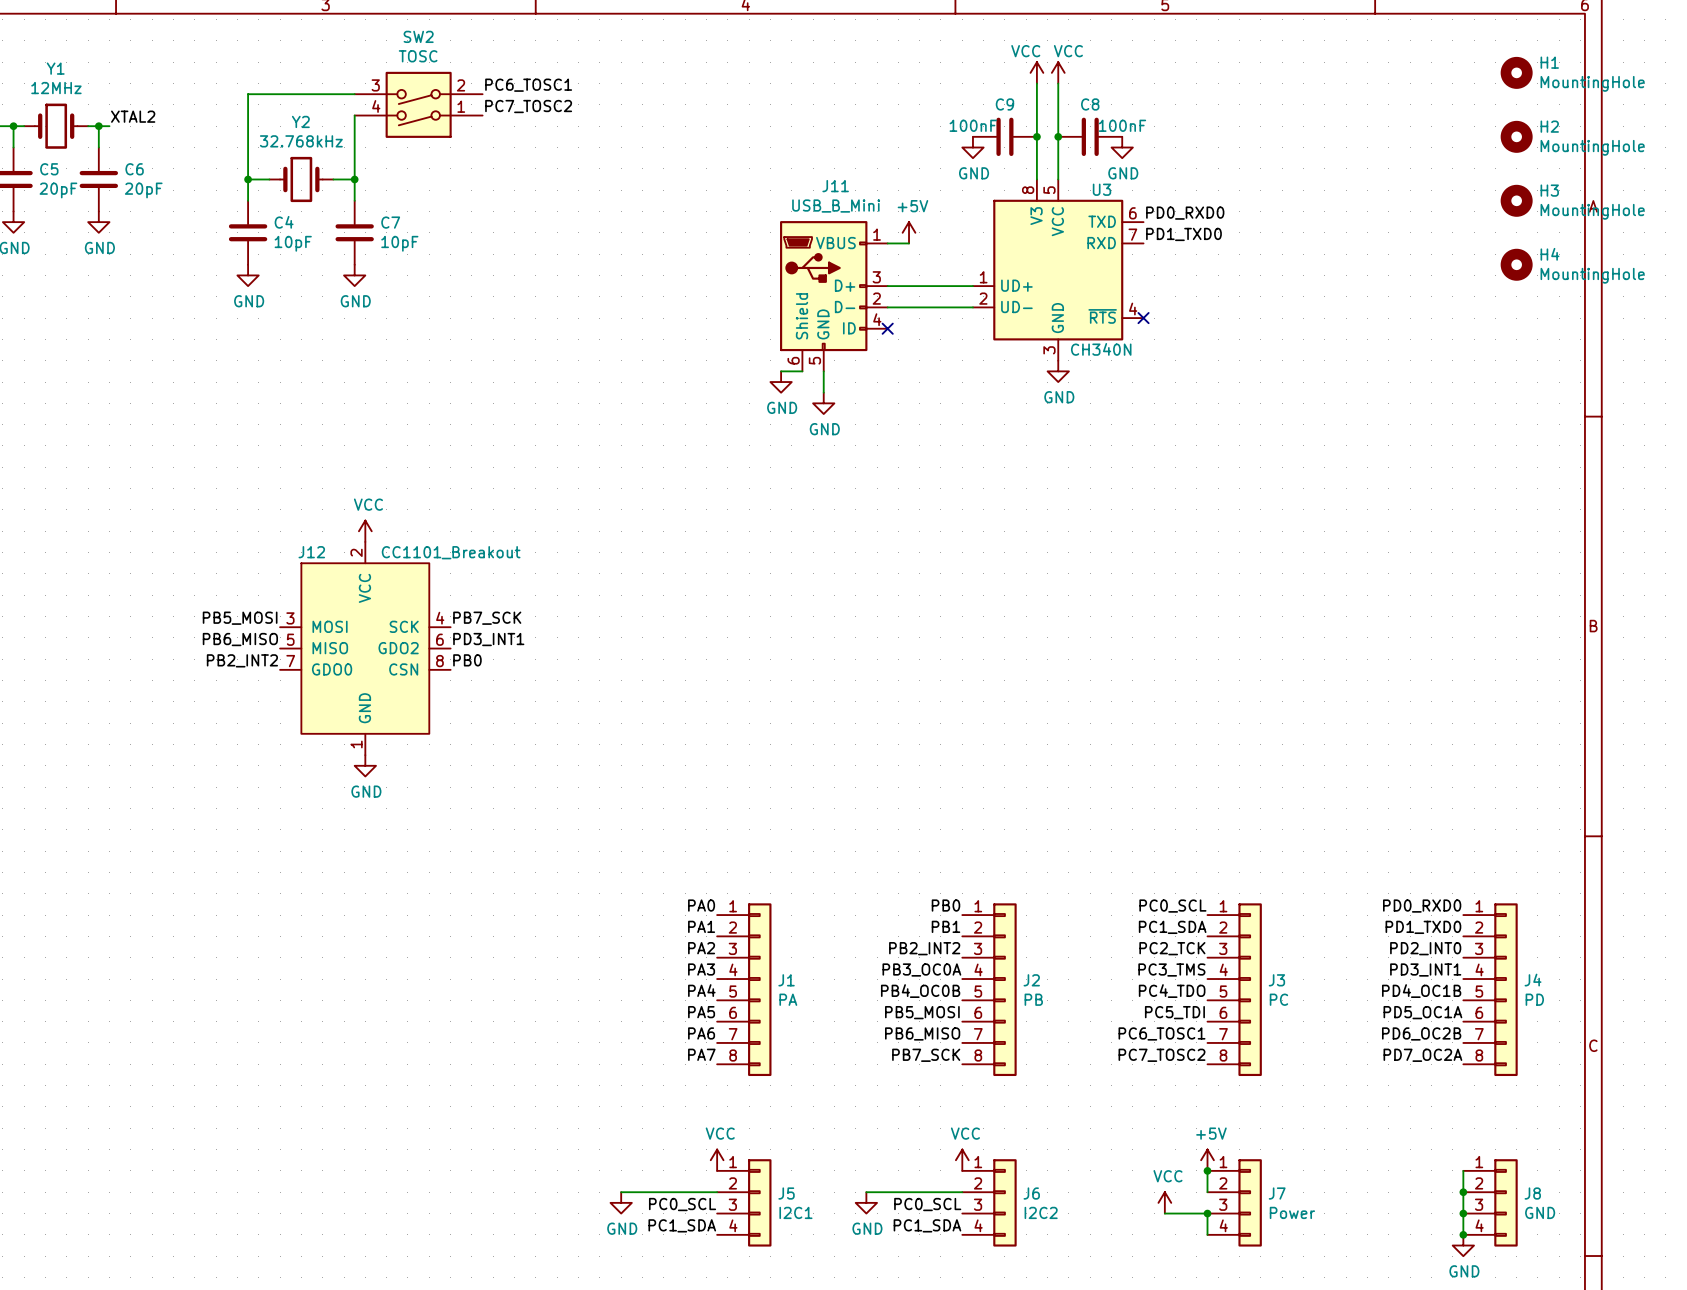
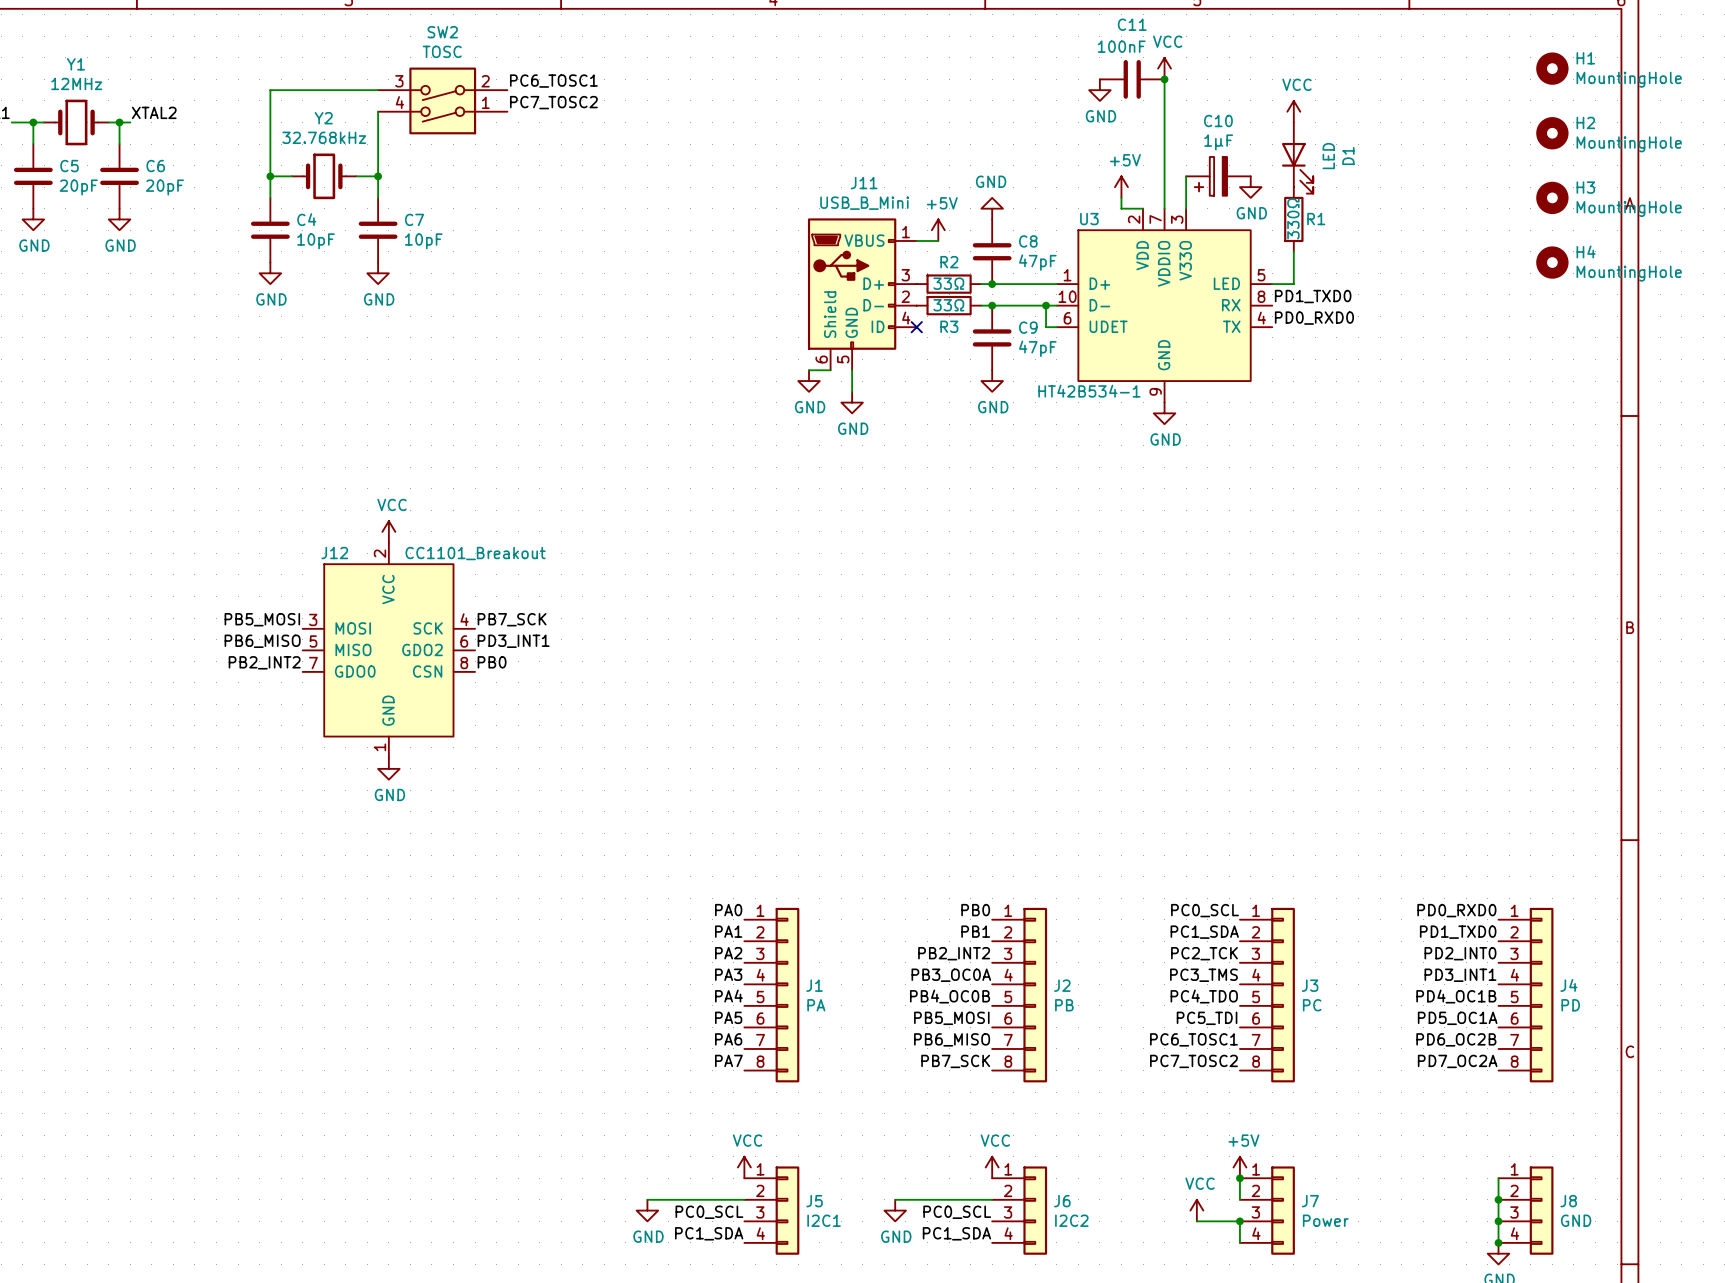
power symbol: VCC (1036, 72) -> none
power symbol: VCC (1058, 72) -> none
power symbol: none -> VCC (1164, 68)
wire: (1036, 83) (1036, 179) -> none
wire: (1058, 83) (1058, 179) -> none
C11: none -> 100nF (1132, 79)
wire: none -> (1164, 79) (1164, 208)
junction: none -> (1164, 79)
power symbol: none -> GND (1099, 90)
power symbol: none -> VCC (1293, 111)
C9 value: 100nF (973, 125) -> 47pF (1037, 348)
C8 value: 100nF (1122, 125) -> 47pF (1037, 262)
C9 rotation: 0° (1004, 136) -> 90° clockwise (992, 337)
C9 position: (1004, 136) -> (992, 337)
junction: (1036, 136) -> none
junction: (1058, 136) -> none
C8 rotation: 0° (1090, 136) -> 90° clockwise (992, 251)
C8 position: (1090, 136) -> (992, 251)
power symbol: GND (972, 147) -> none
power symbol: GND (1122, 147) -> none
D1: none -> LED (1297, 158)
U3 symbol: [972, 179, 1144, 361] -> [1056, 208, 1273, 403]
wire: none -> (1186, 176) (1186, 208)
C10: none -> 1µF (1218, 176)
U3 name position: U3 (1101, 189) -> U3 (1089, 219)
power symbol: none -> +5V (1121, 187)
power symbol: none -> GND (1250, 187)
power symbol: none -> GND (992, 208)
label position: PD0_RXD0 (1185, 213) -> PD0_RXD0 (1314, 318)
R1: none -> 330Ω (1293, 219)
label position: PD1_TXD0 (1183, 234) -> PD1_TXD0 (1313, 296)
wire: none -> (1293, 251) (1293, 284) (1272, 284)
wire: (887, 286) (951, 286) -> none
R2: none -> 33Ω (949, 284)
junction: none -> (992, 284)
wire: (887, 307) (951, 307) -> none
R3: none -> 33Ω (949, 305)
junction: none -> (992, 305)
junction: none -> (1046, 305)
no-connect mark: (1143, 318) -> none
U3 value: CH340N (1101, 349) -> HT42B534-1 (1089, 391)
power symbol: GND (1058, 371) -> none
power symbol: none -> GND (992, 381)
power symbol: none -> GND (1164, 413)

